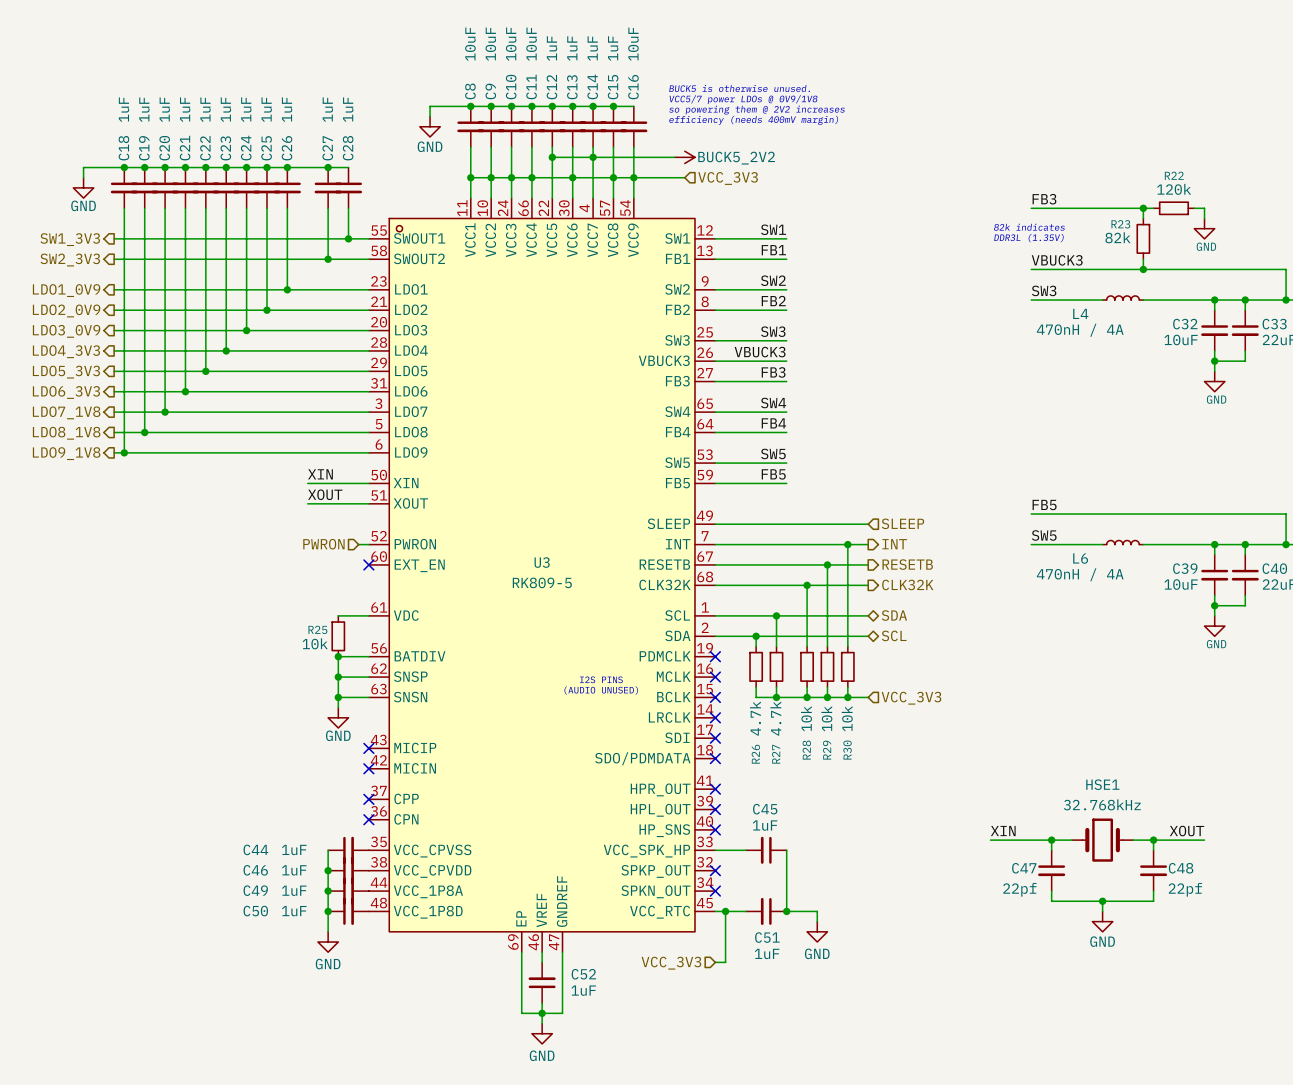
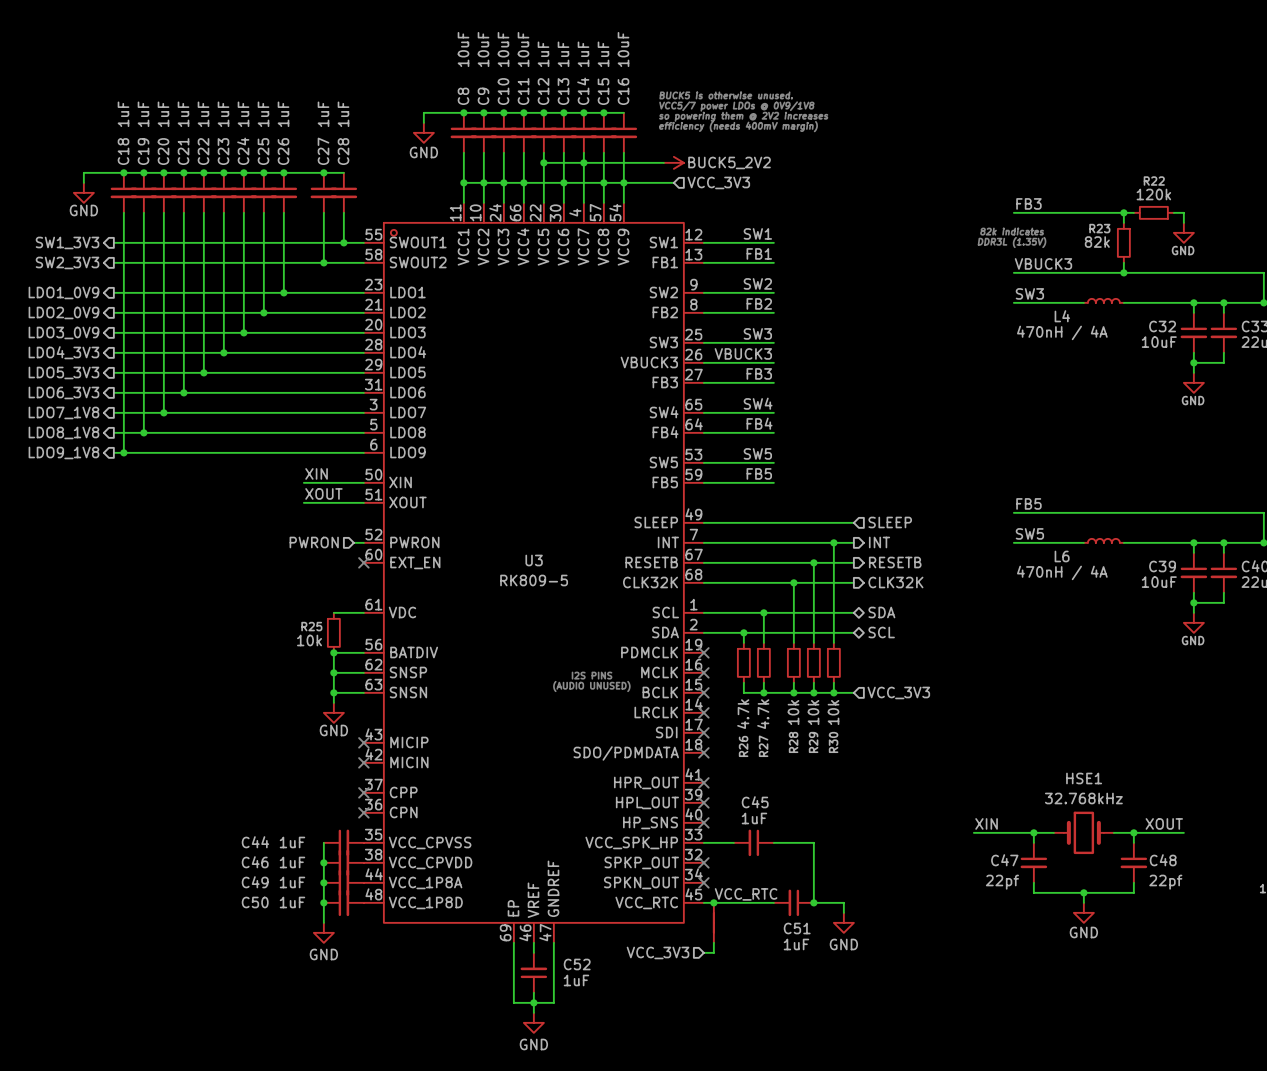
wire: (786, 850) (786, 911) (817, 911) (817, 921) -> (773, 842) (813, 842) (813, 902) (843, 902) (843, 912)
label: none -> VCC_RTC (746, 894)
C51 position: (766, 911) -> (793, 902)
junction position: (786, 911) -> (813, 902)
part: none -> (713, 922)
power symbol position: GND (817, 931) -> GND (843, 922)

